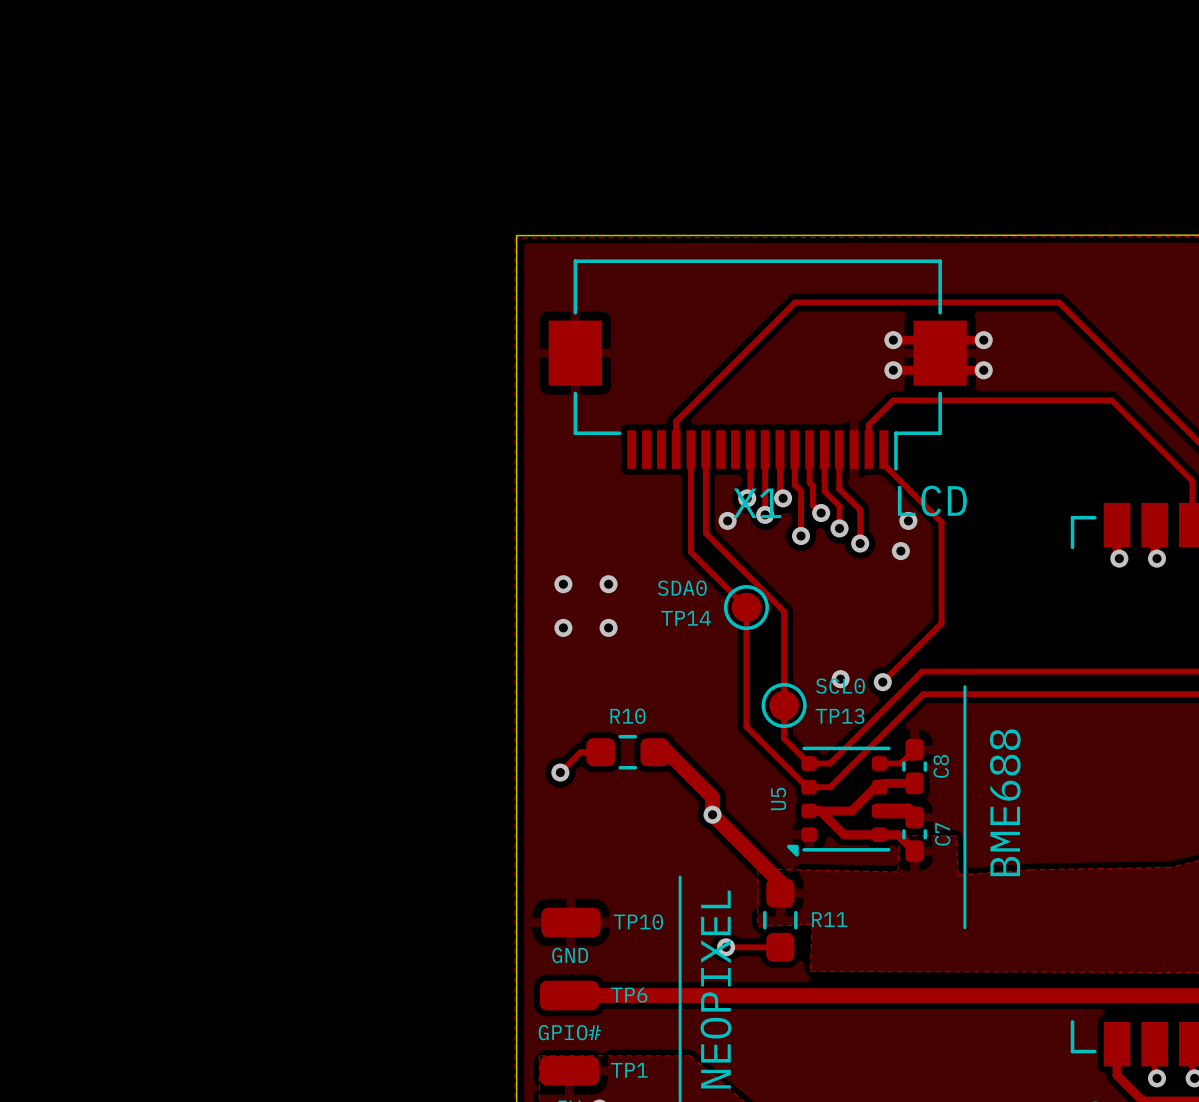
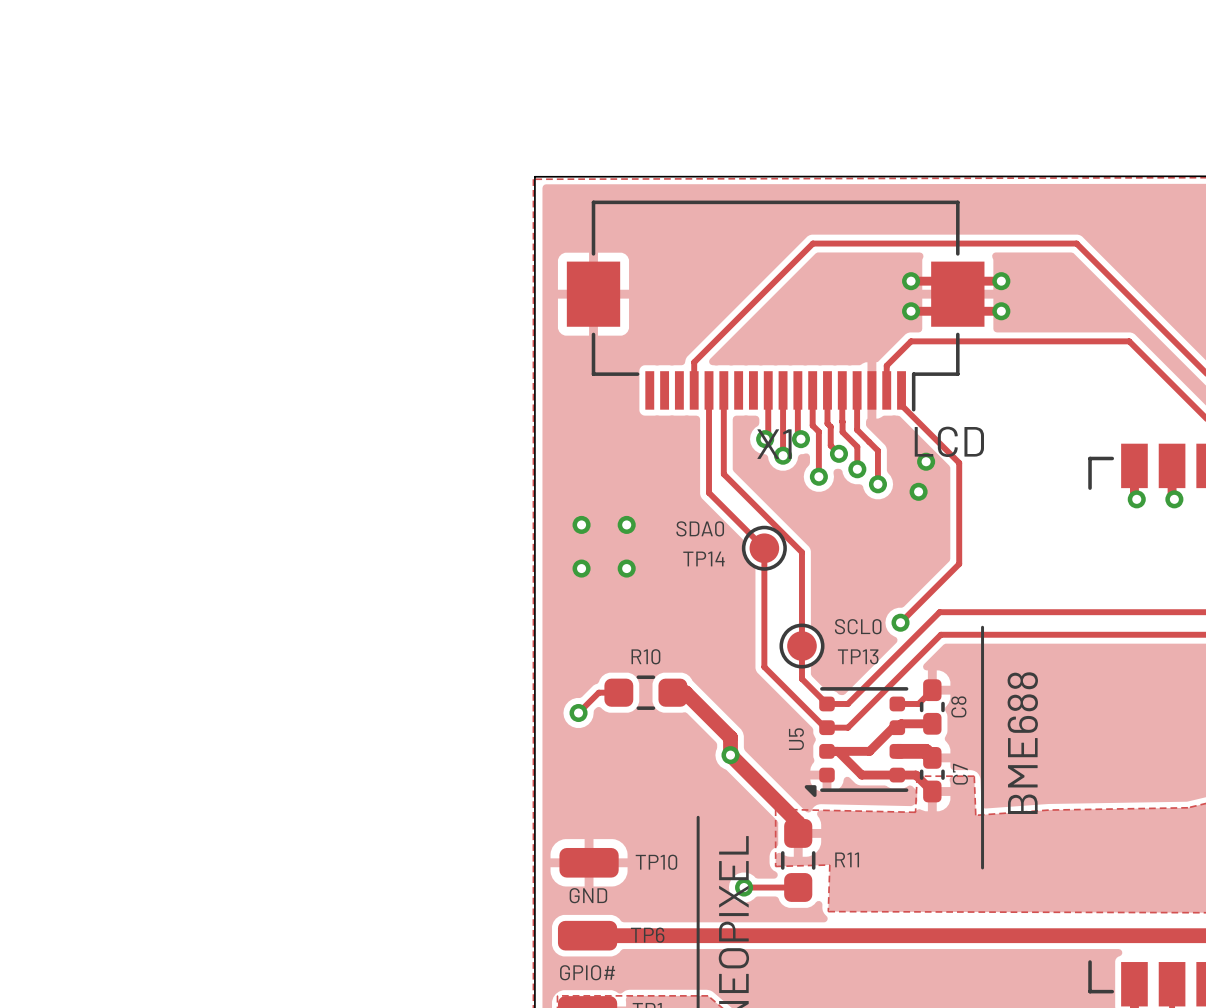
via: (727, 520) -> none
via: (840, 679) -> none

